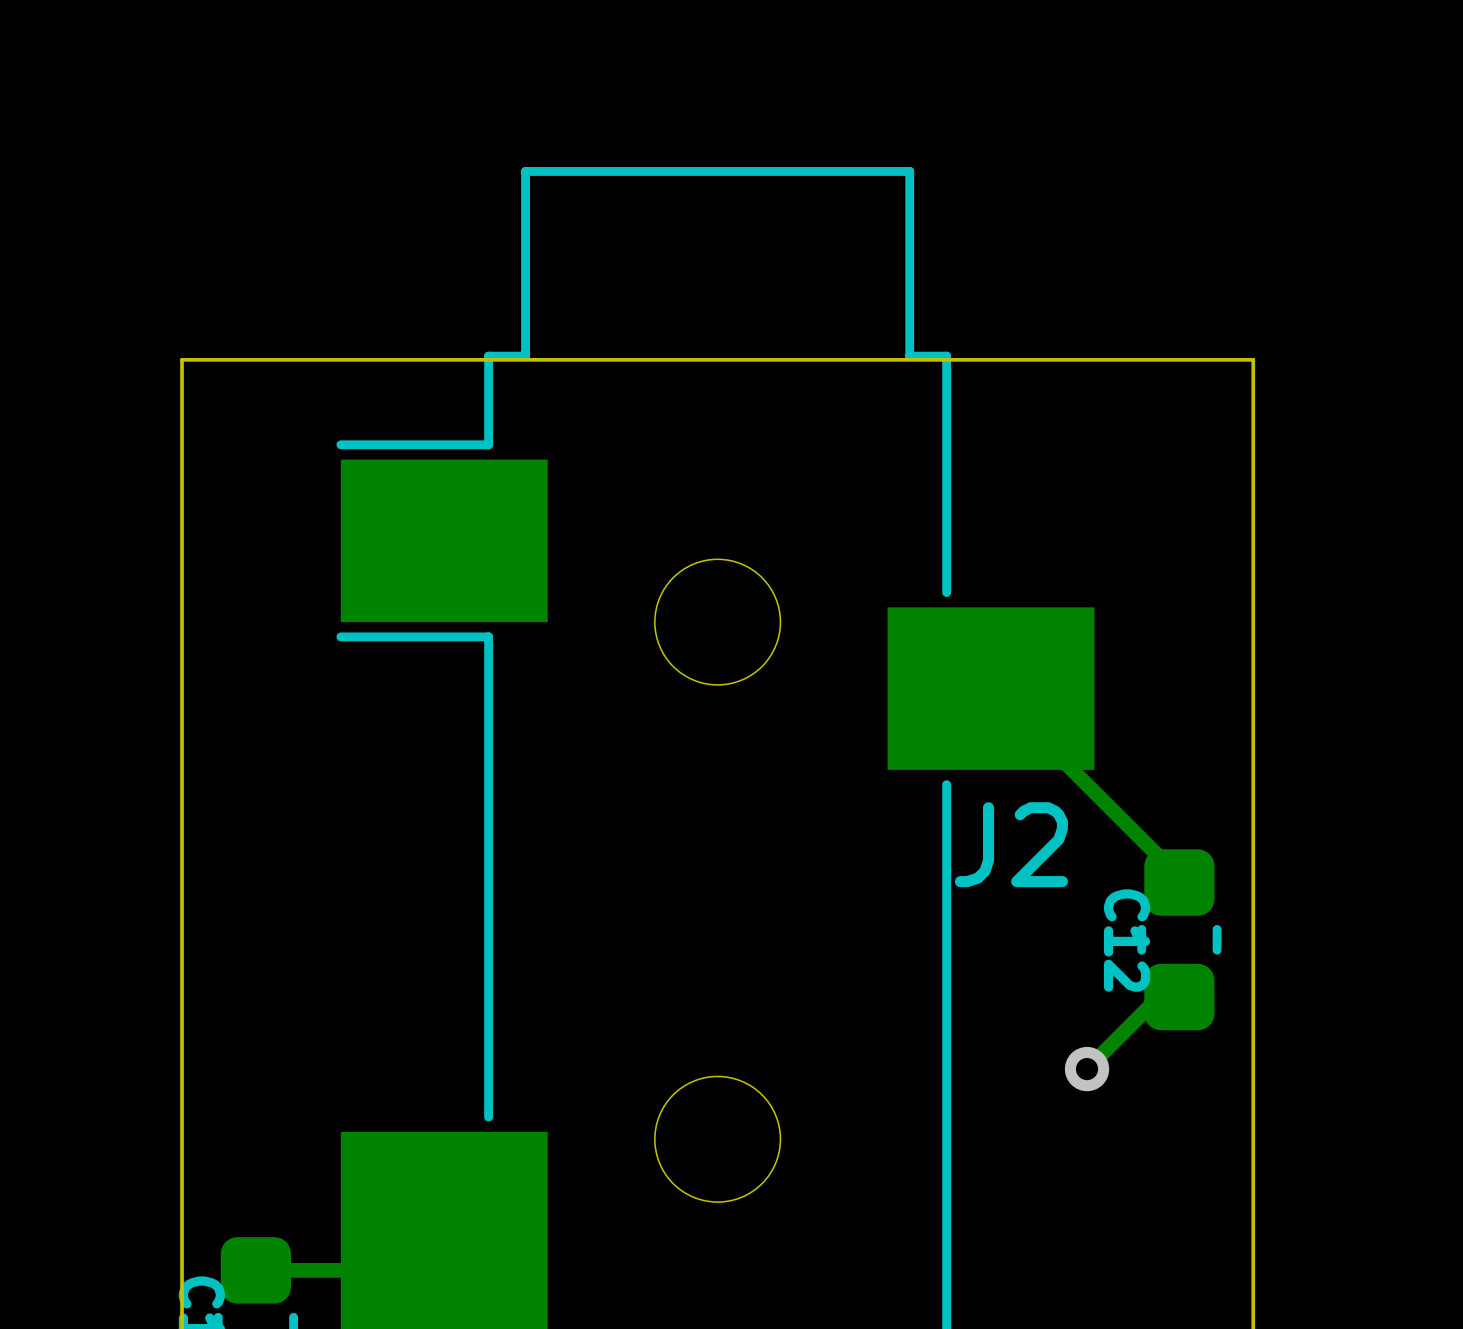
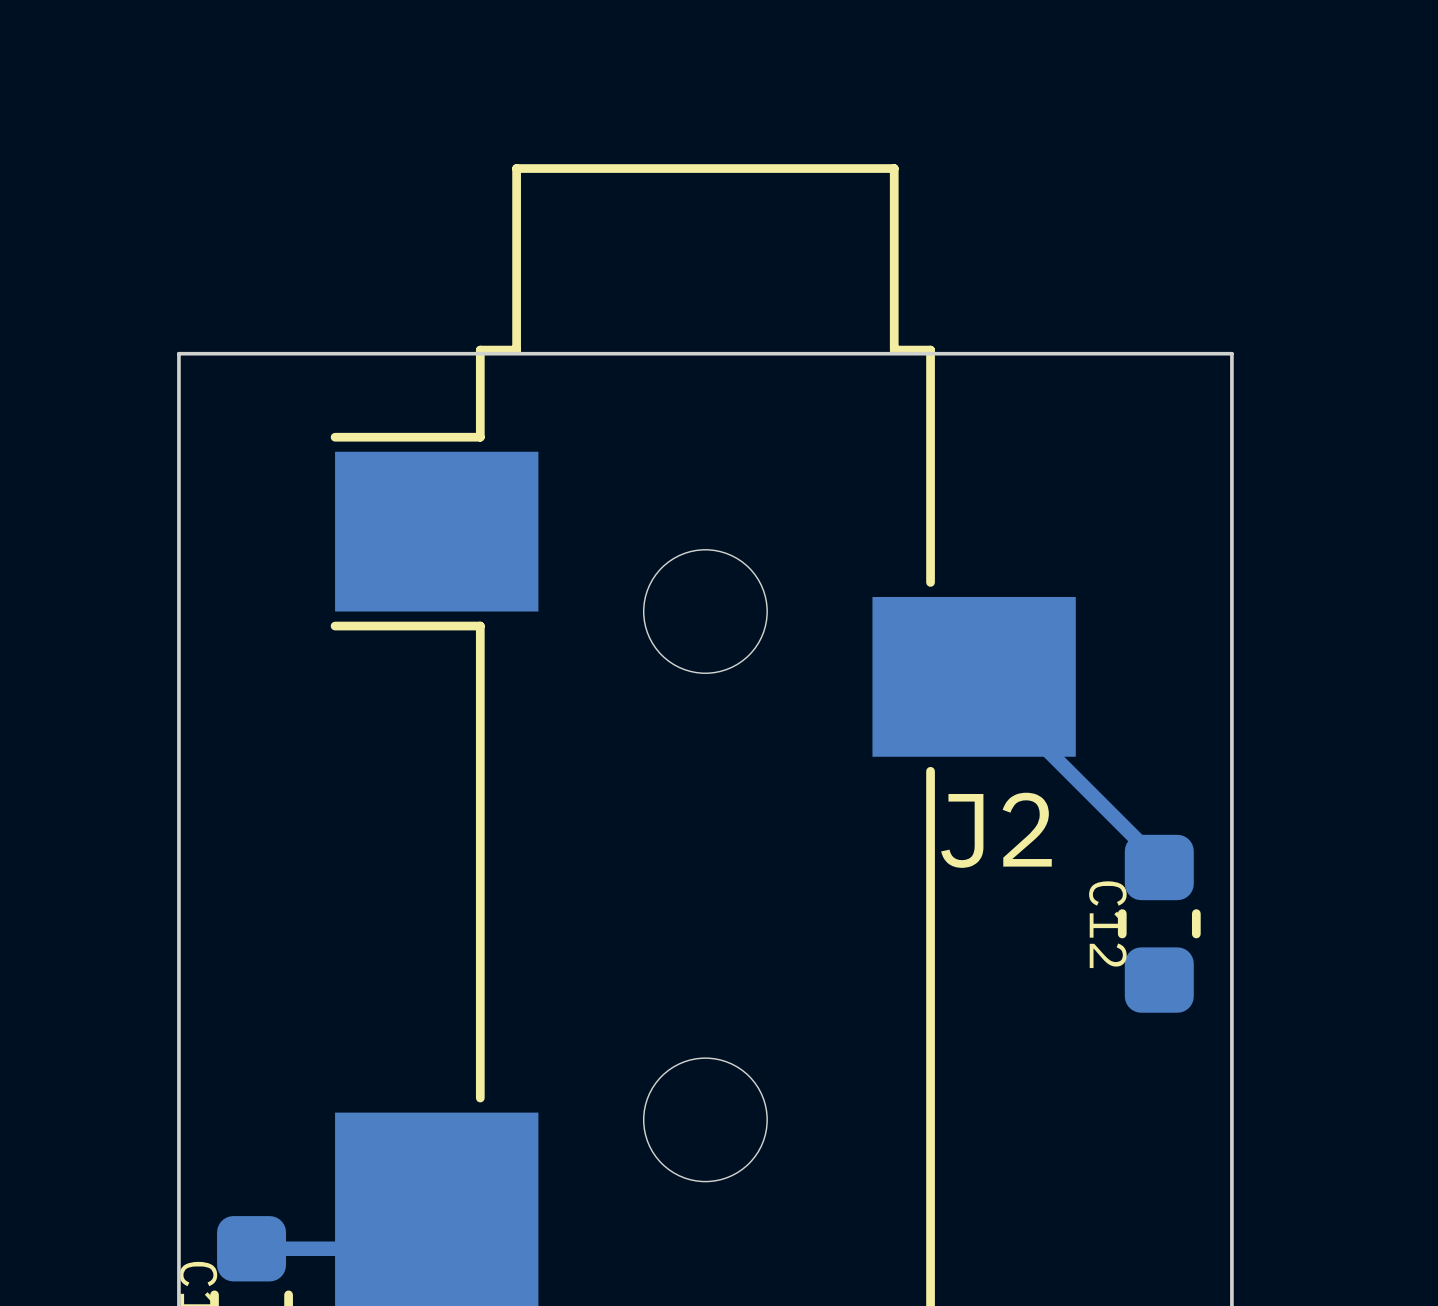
track: (1179, 997) (1159, 997) (1087, 1069) -> none
via: (1087, 1069) -> none

